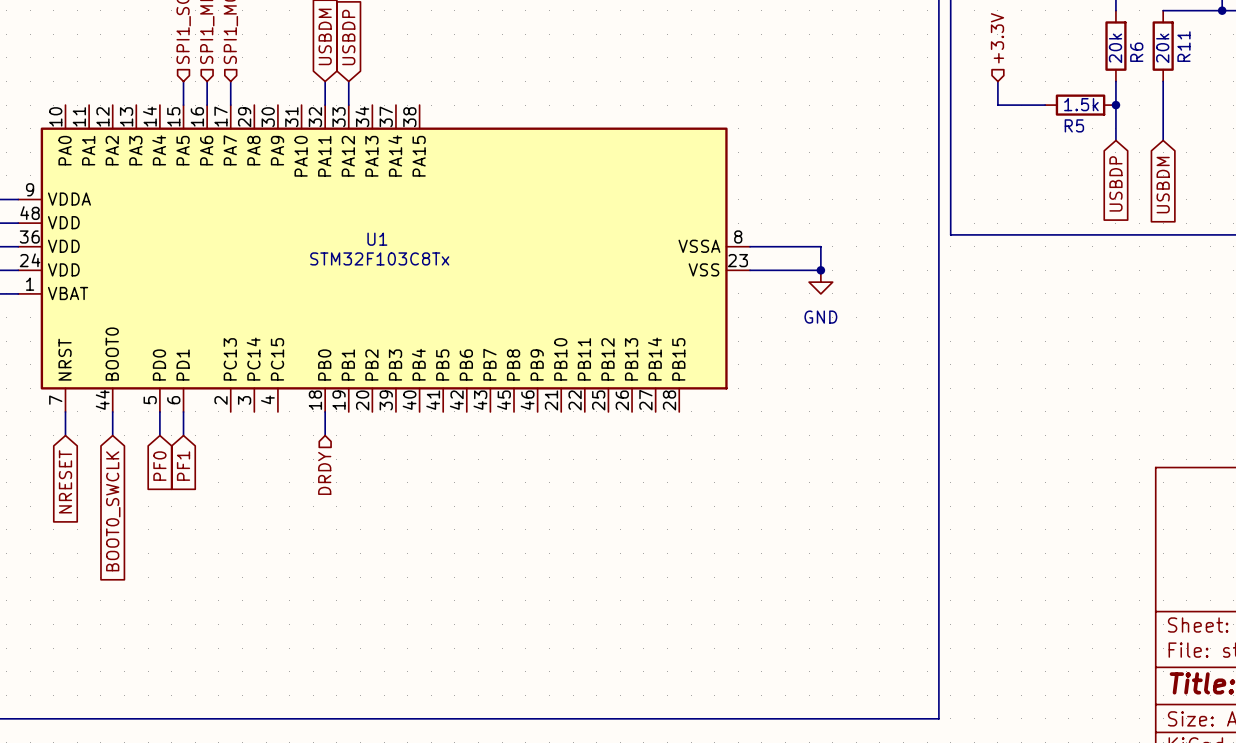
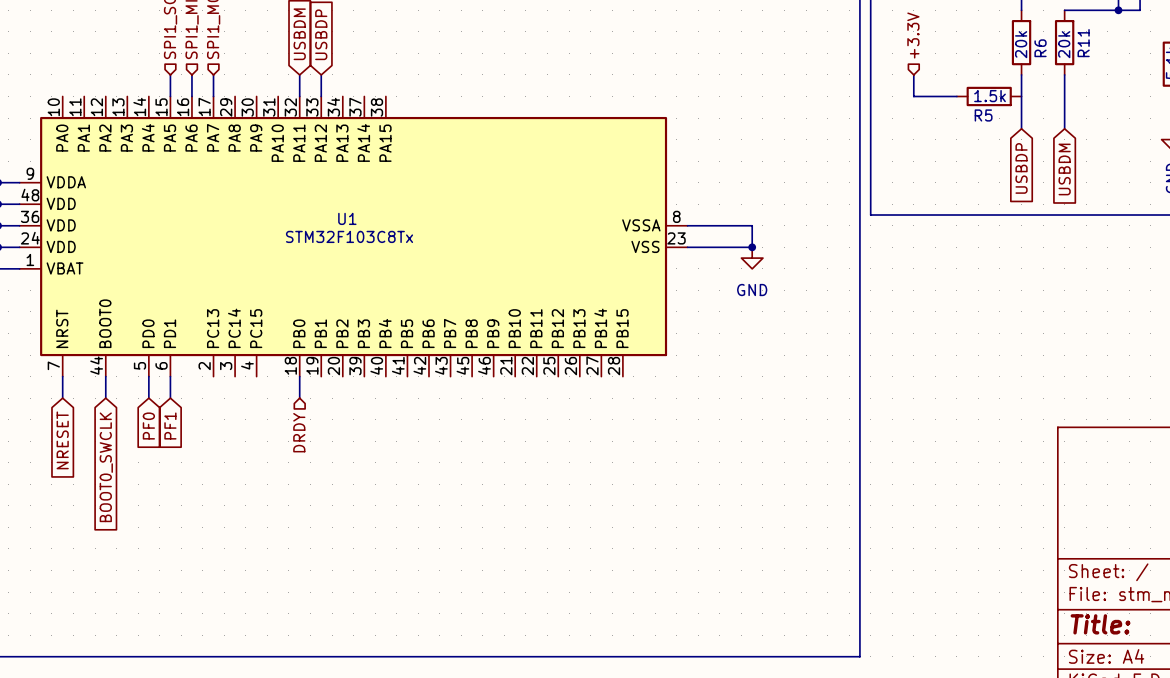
junction: (1115, 105) -> none

